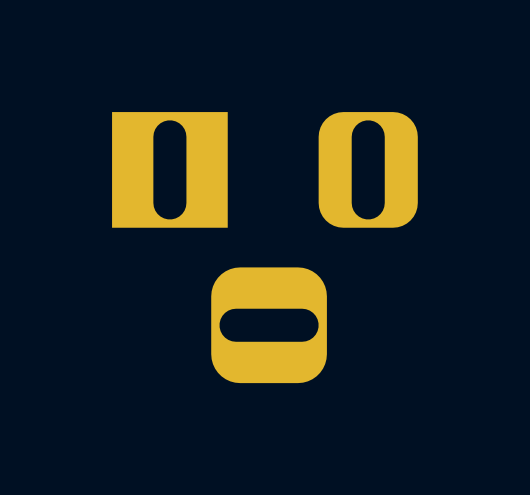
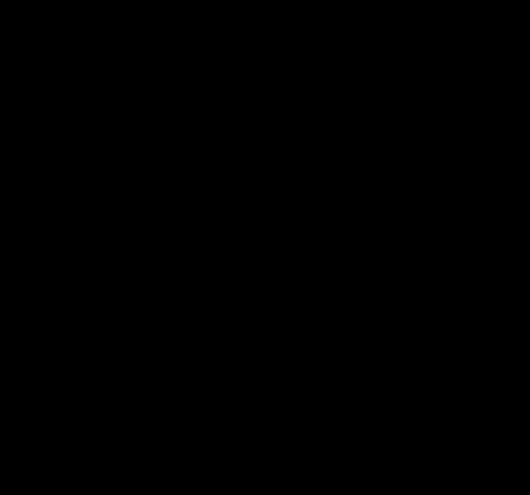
part: (264, 247) -> none

